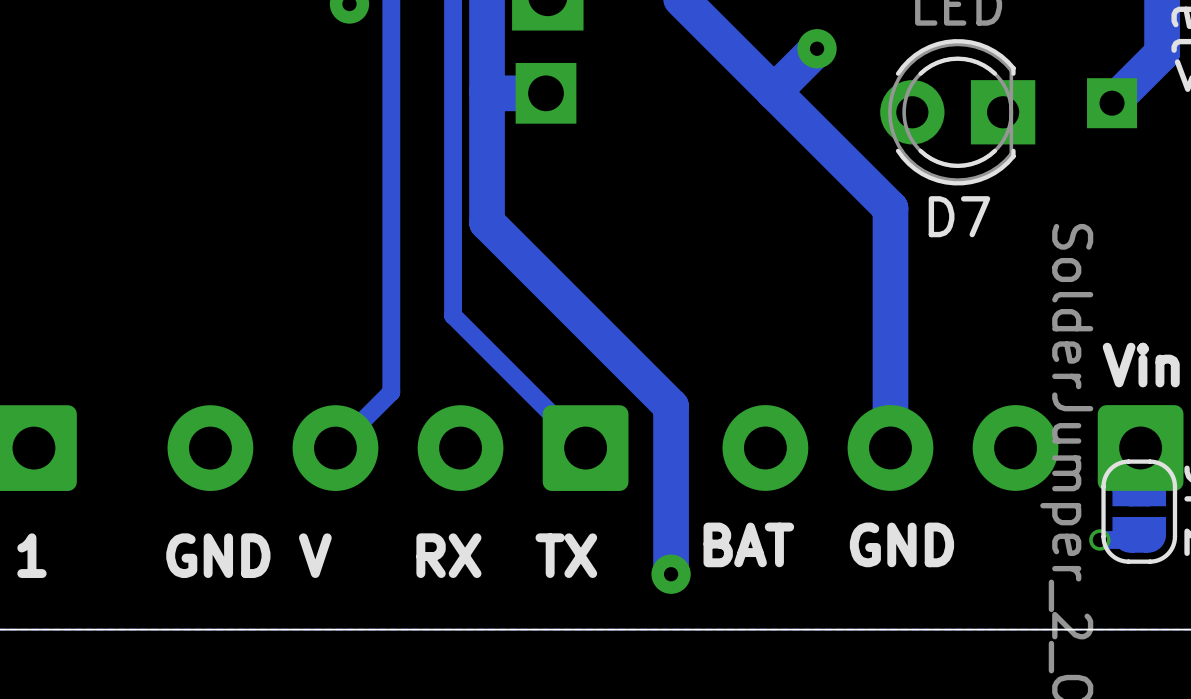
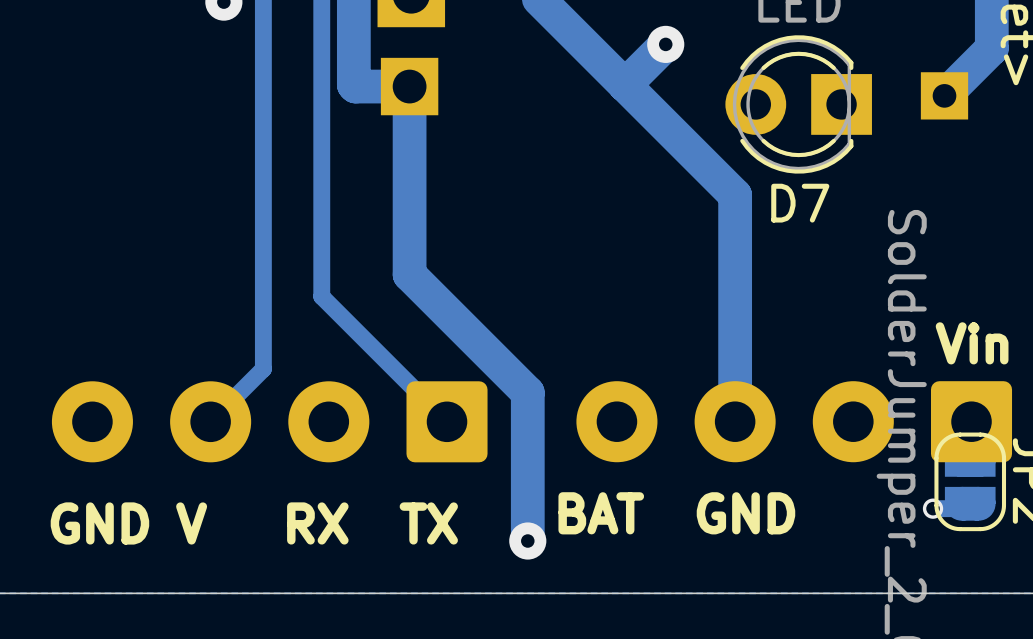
track: (487, 91) (487, 222) (671, 406) (671, 417) -> (409, 86) (409, 274) (527, 392)

